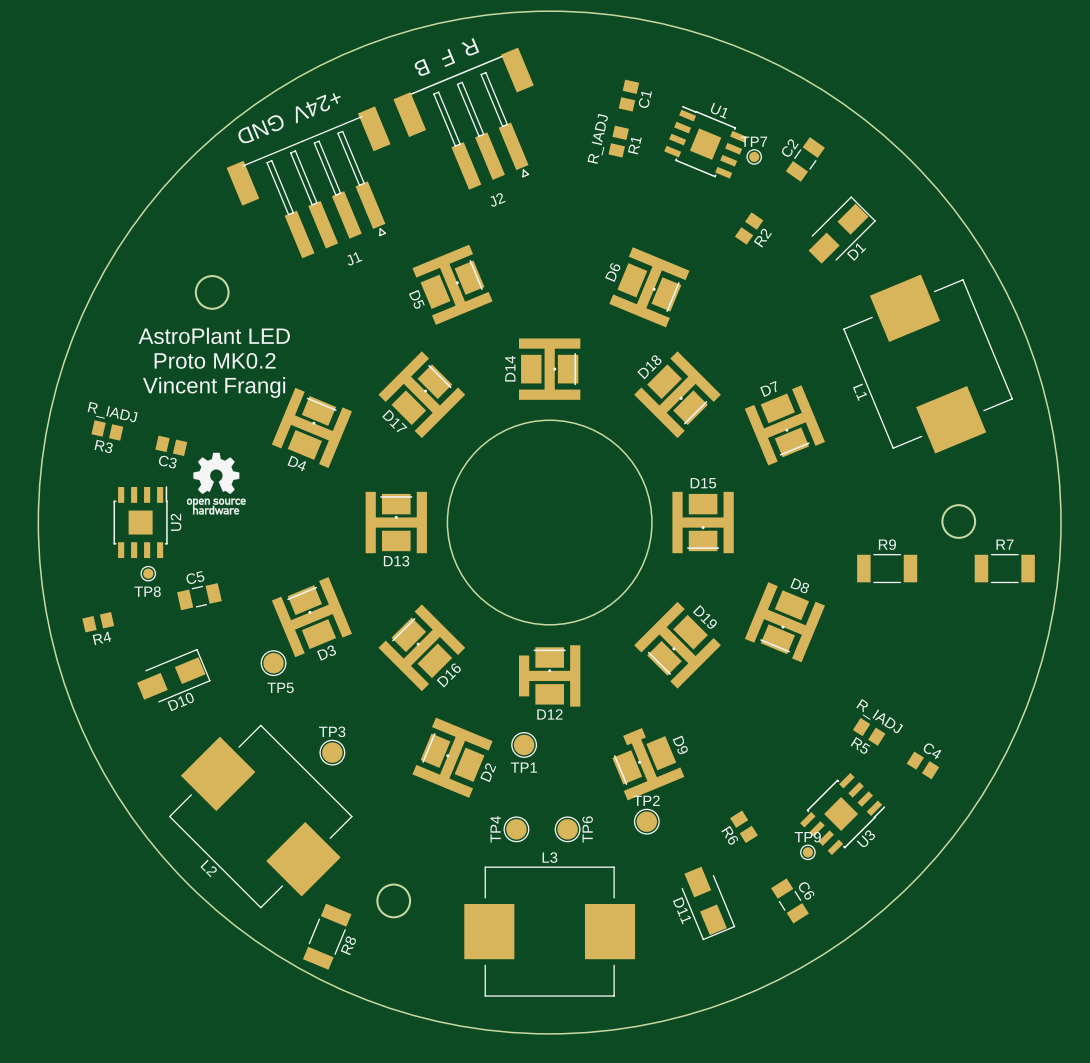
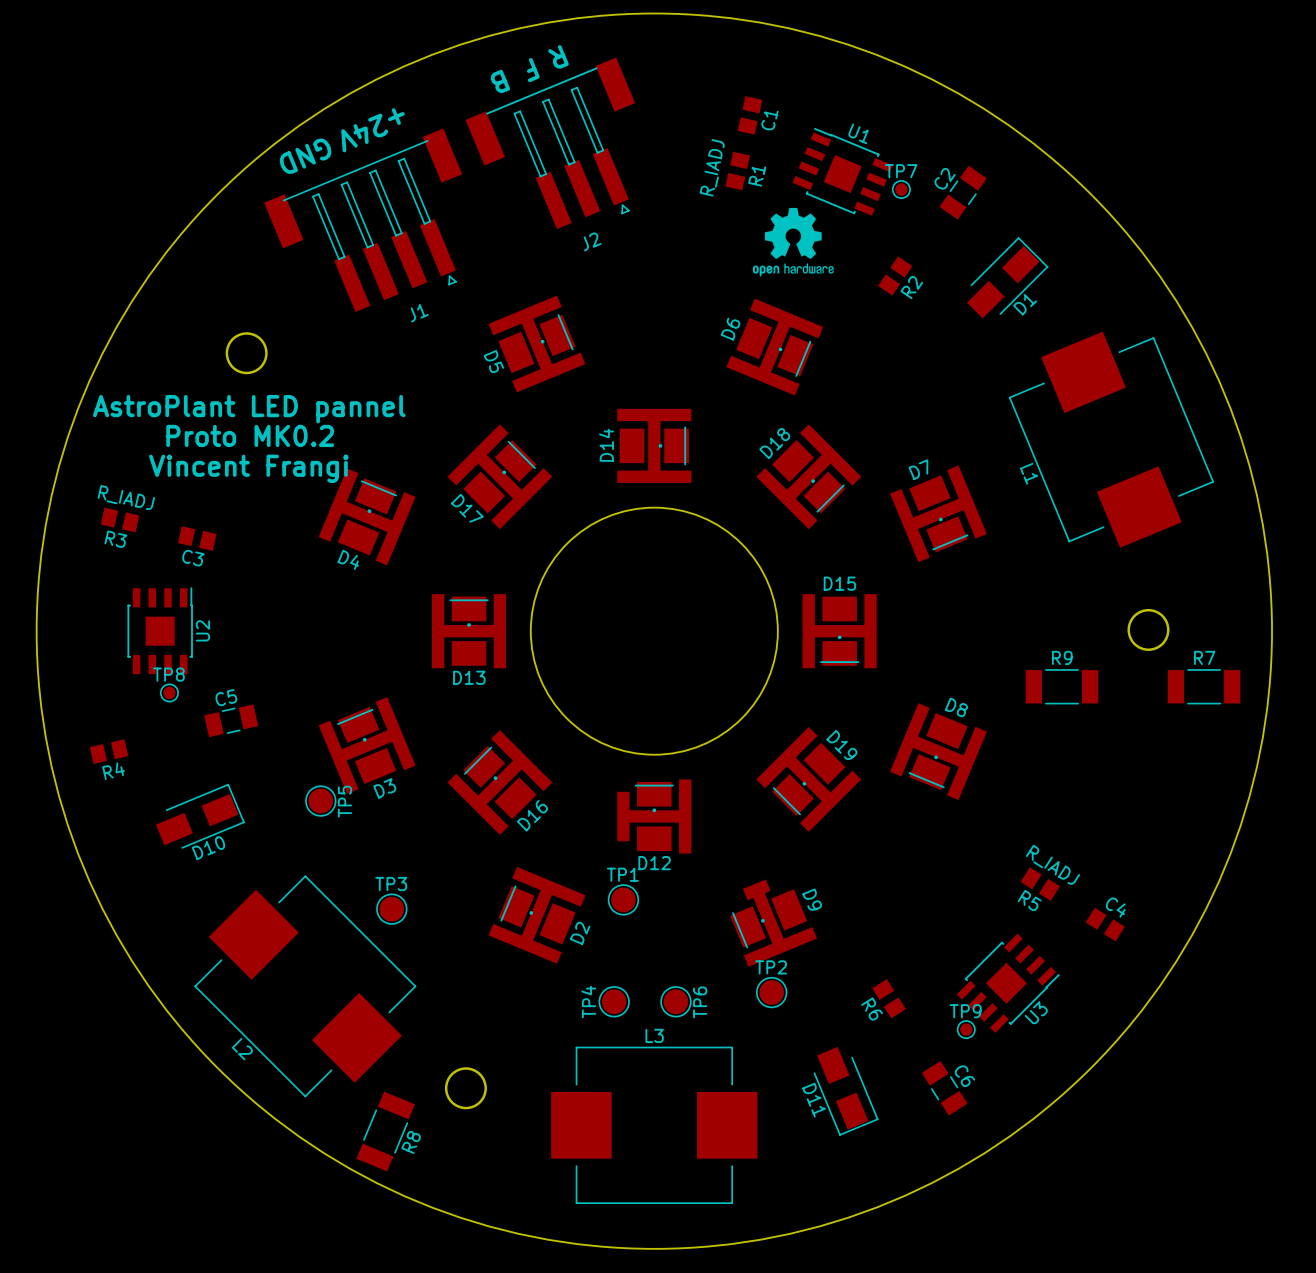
drawing: none -> [752, 207, 834, 277]
text: AstroPlant LED (214, 335) -> AstroPlant LED pannel (249, 409)
drawing: [186, 452, 246, 515] -> none
TP8 name position: TP8 (147, 591) -> TP8 (168, 674)
TP5 name rotation: 0° (280, 687) -> 90° counterclockwise (345, 801)
TP1 name position: TP1 (523, 767) -> TP1 (622, 874)

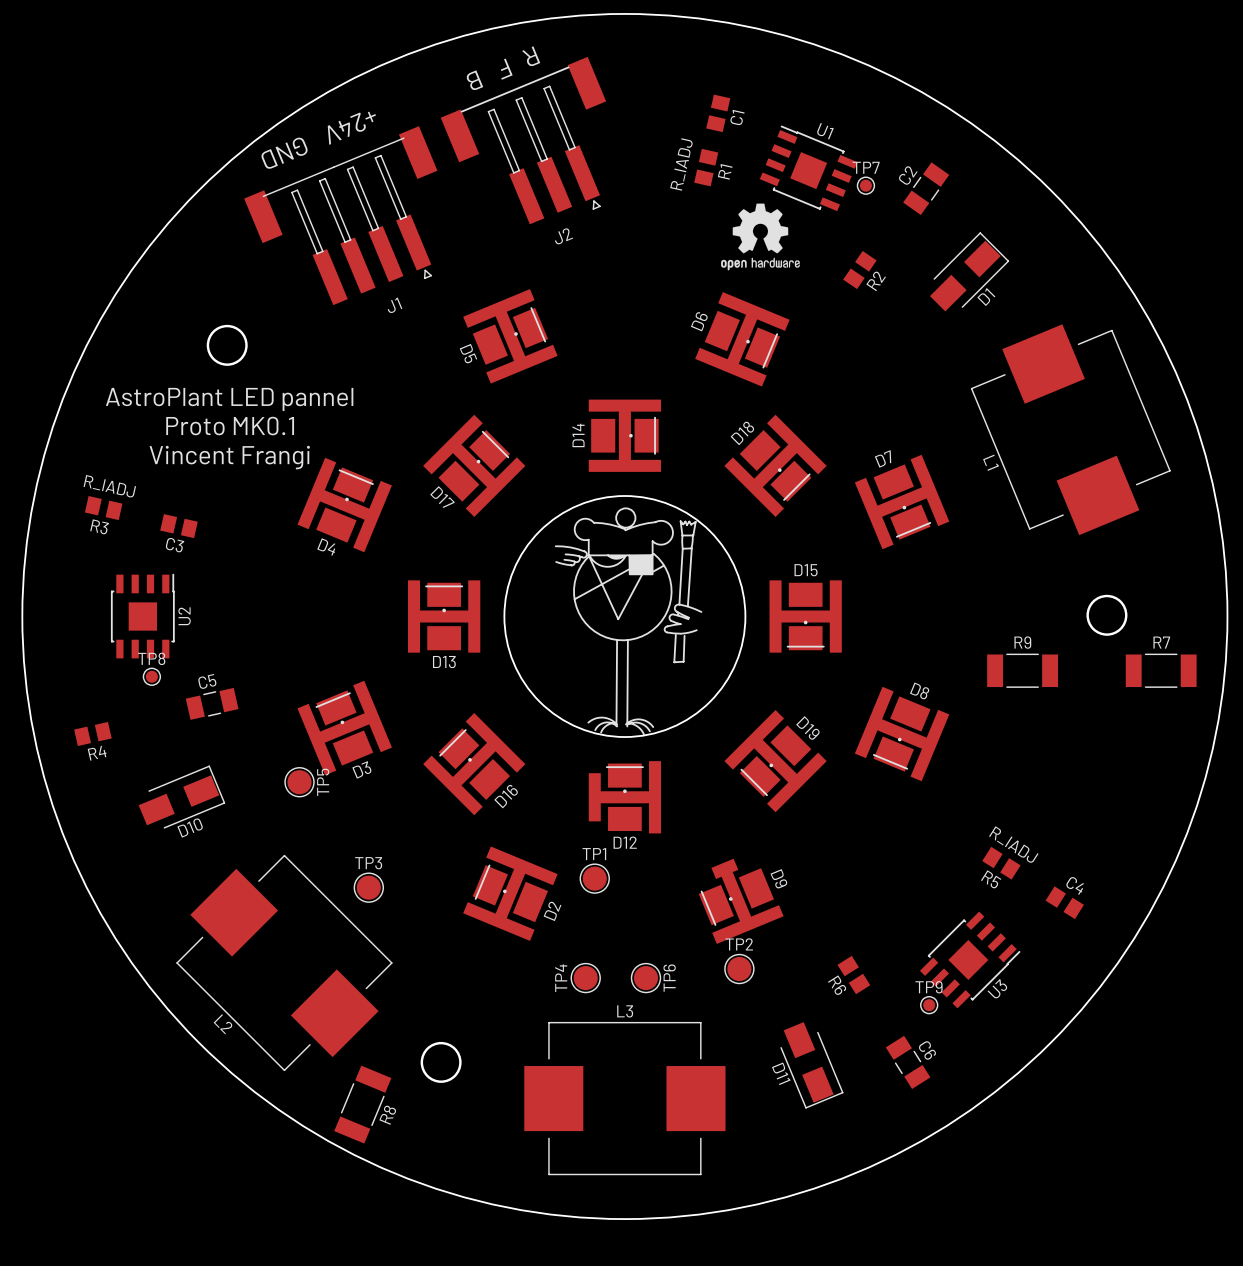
text: Proto MK0.2 (250, 435) -> Proto MK0.1 (230, 426)
drawing: none -> [554, 507, 703, 736]

